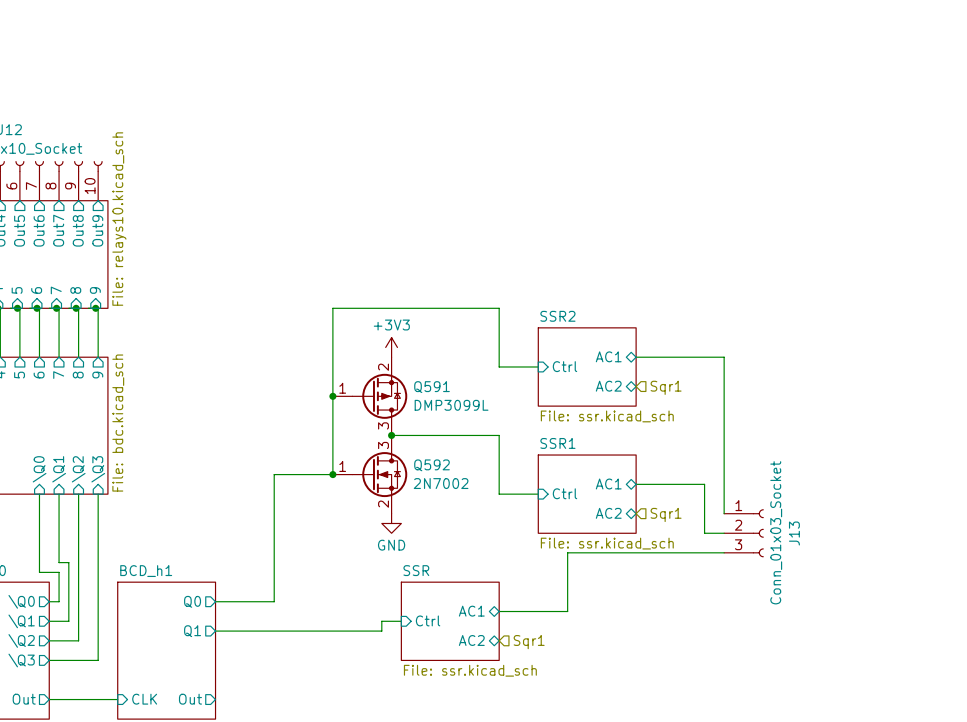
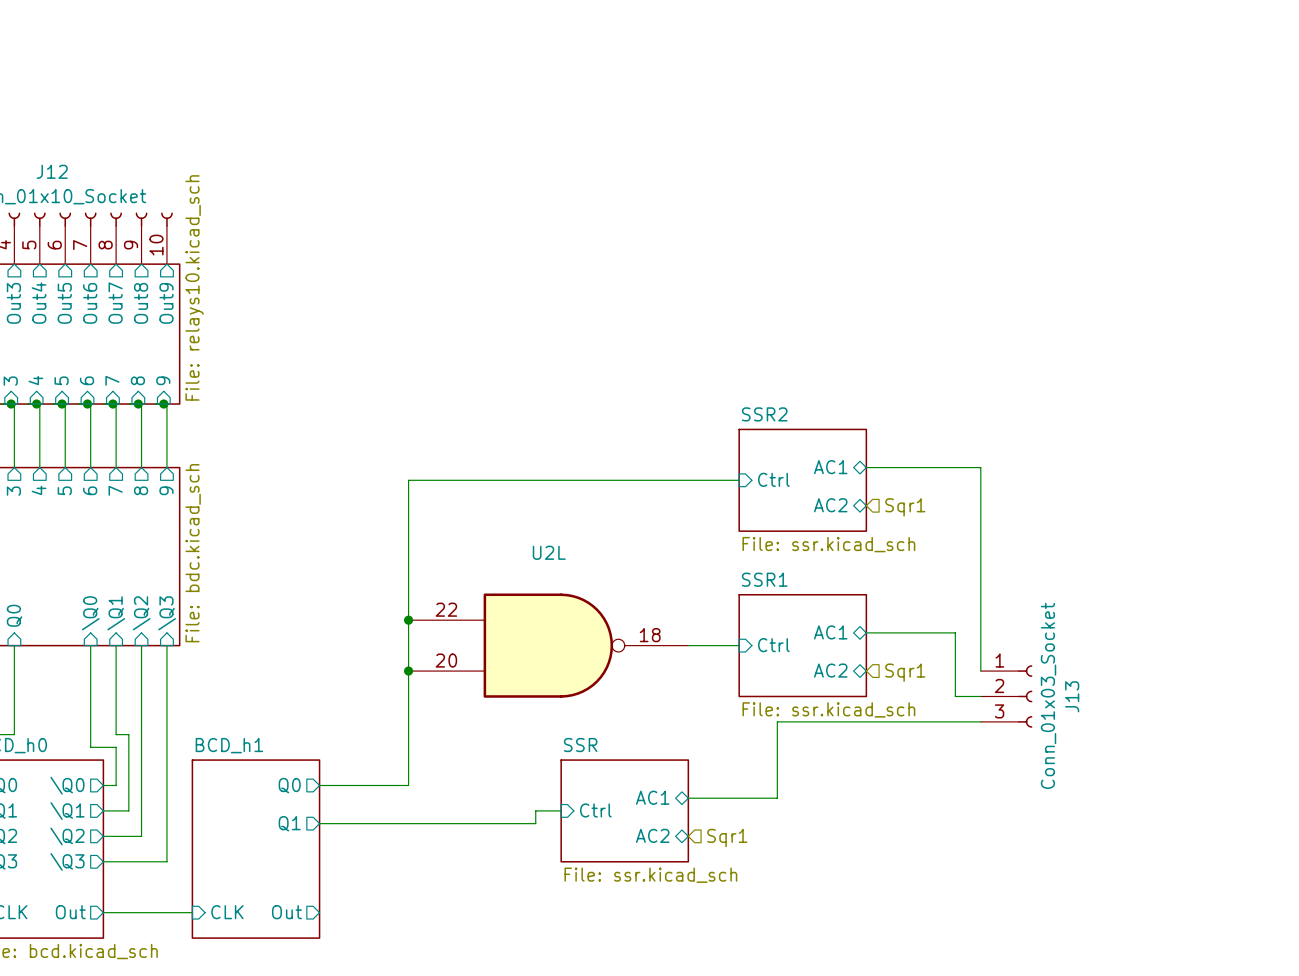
power symbol: +3V3 (391, 347) -> none
wire: (499, 366) (499, 308) (332, 308) (332, 474) (274, 474) (274, 601) -> (688, 480) (408, 480) (408, 785) (395, 785)
junction: (332, 396) -> none
Q591: DMP3099L (370, 396) -> none
wire: (391, 435) (499, 435) (499, 494) -> none
junction: (391, 435) -> none
junction: none -> (408, 620)
junction: (332, 474) -> none
Q592: 2N7002 (370, 474) -> none
U2L: none -> (548, 645)
junction: none -> (408, 671)
power symbol: GND (391, 523) -> none

